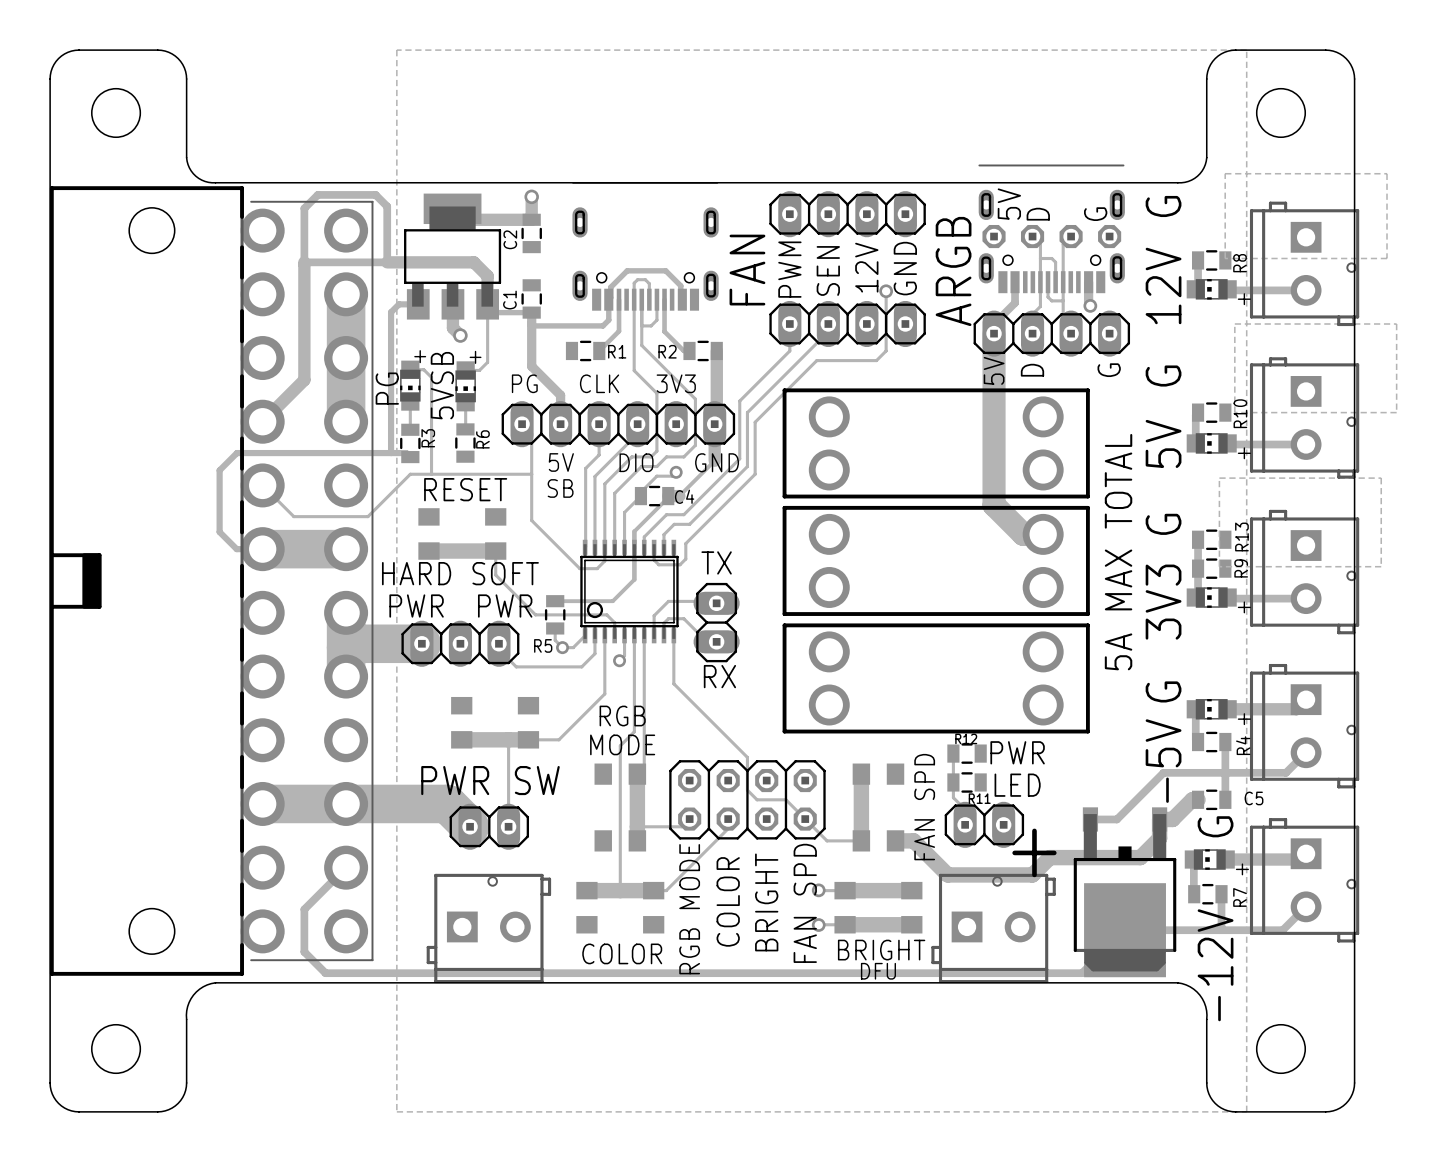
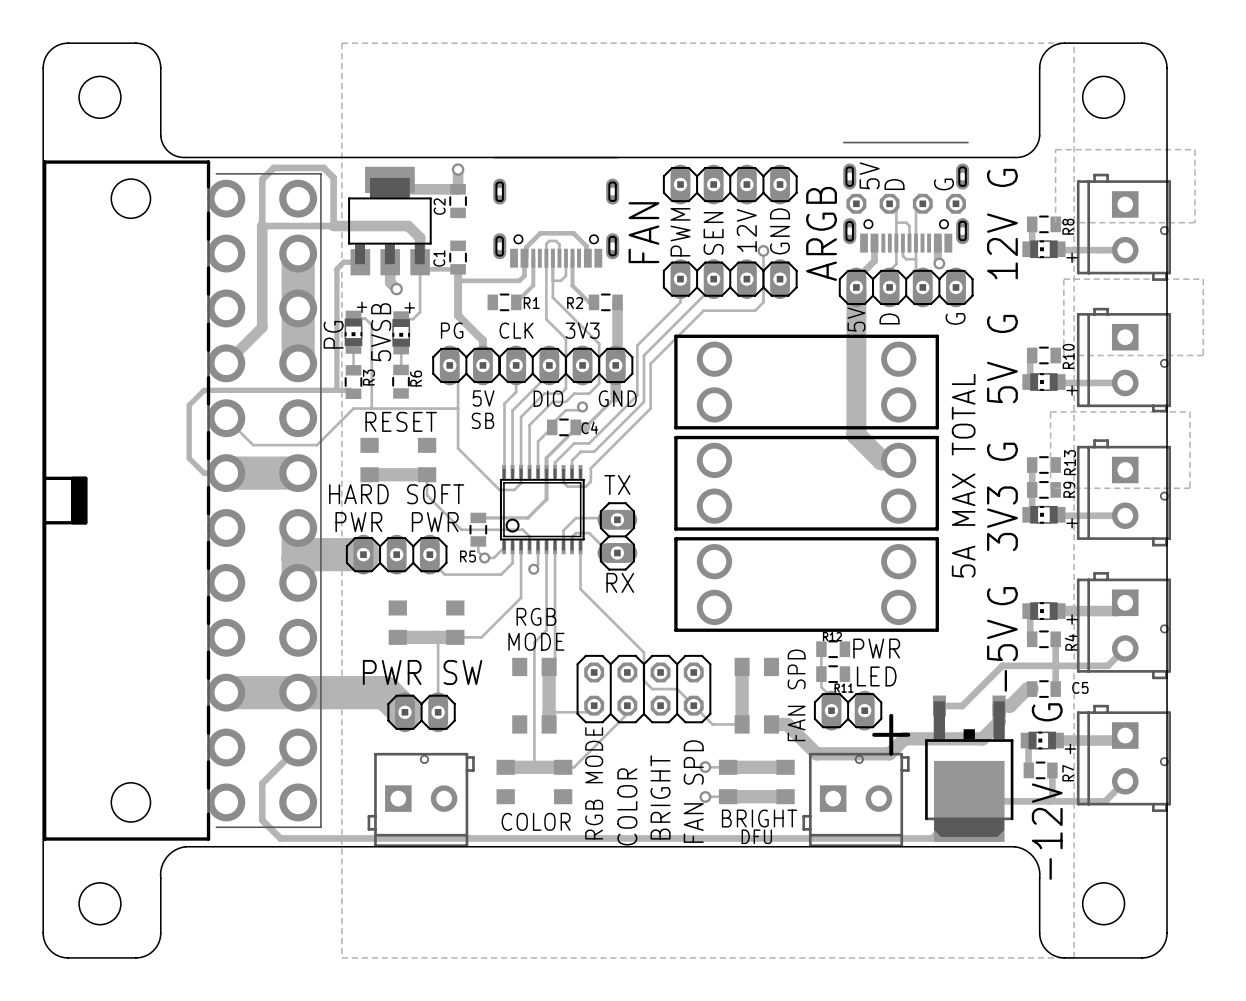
text position: COLOR (728, 901) -> COLOR (627, 806)
text position: BRIGHT (766, 902) -> BRIGHT (660, 797)
text position: FAN SPD (805, 903) -> FAN SPD (693, 791)

